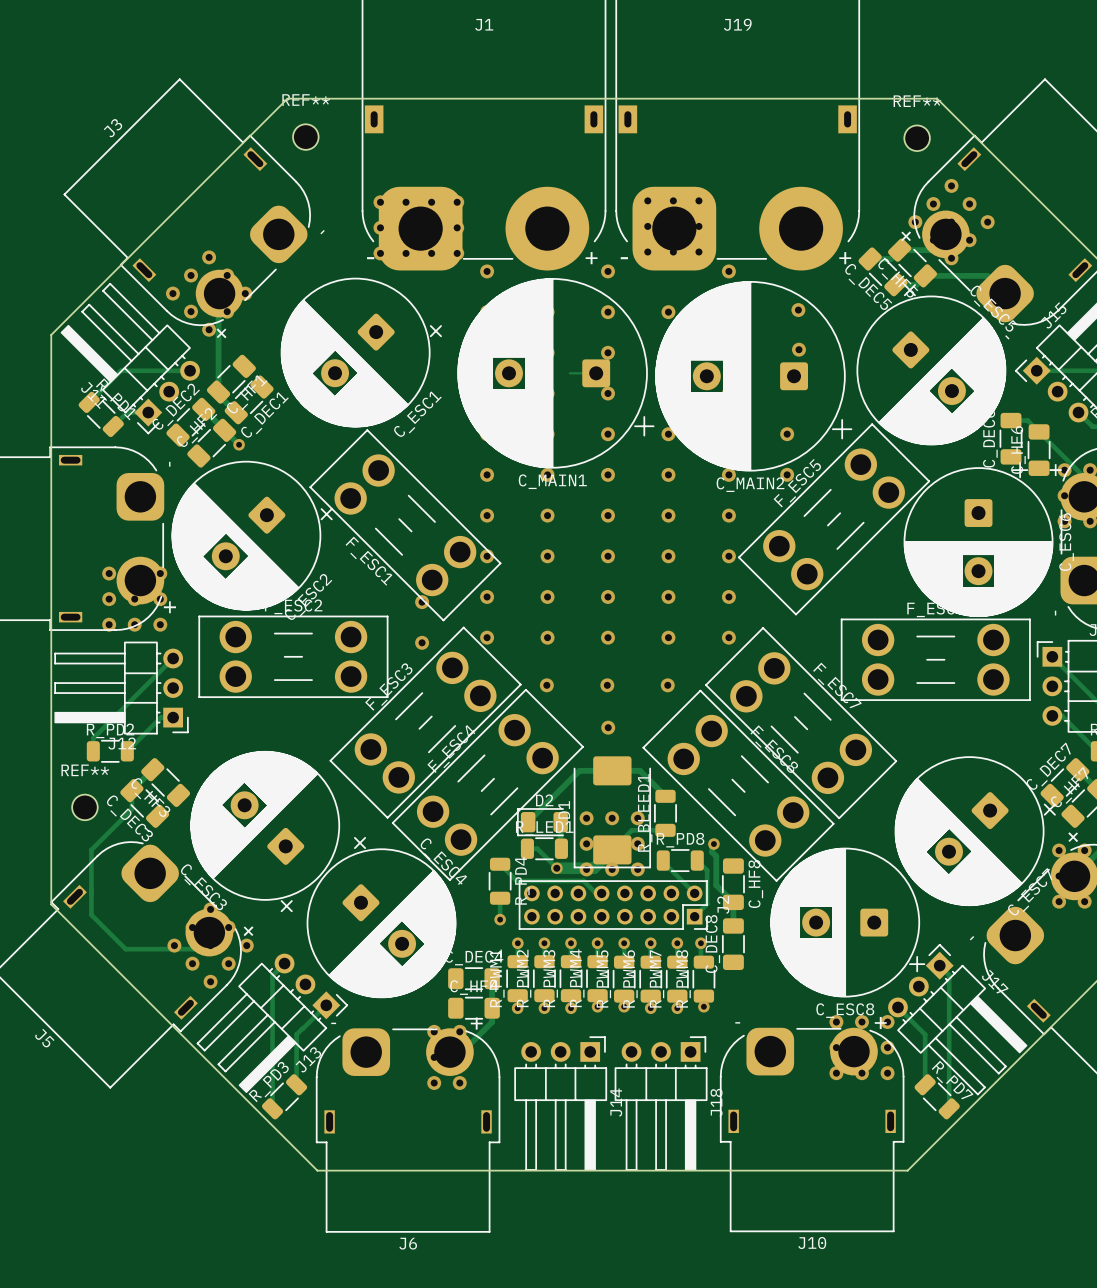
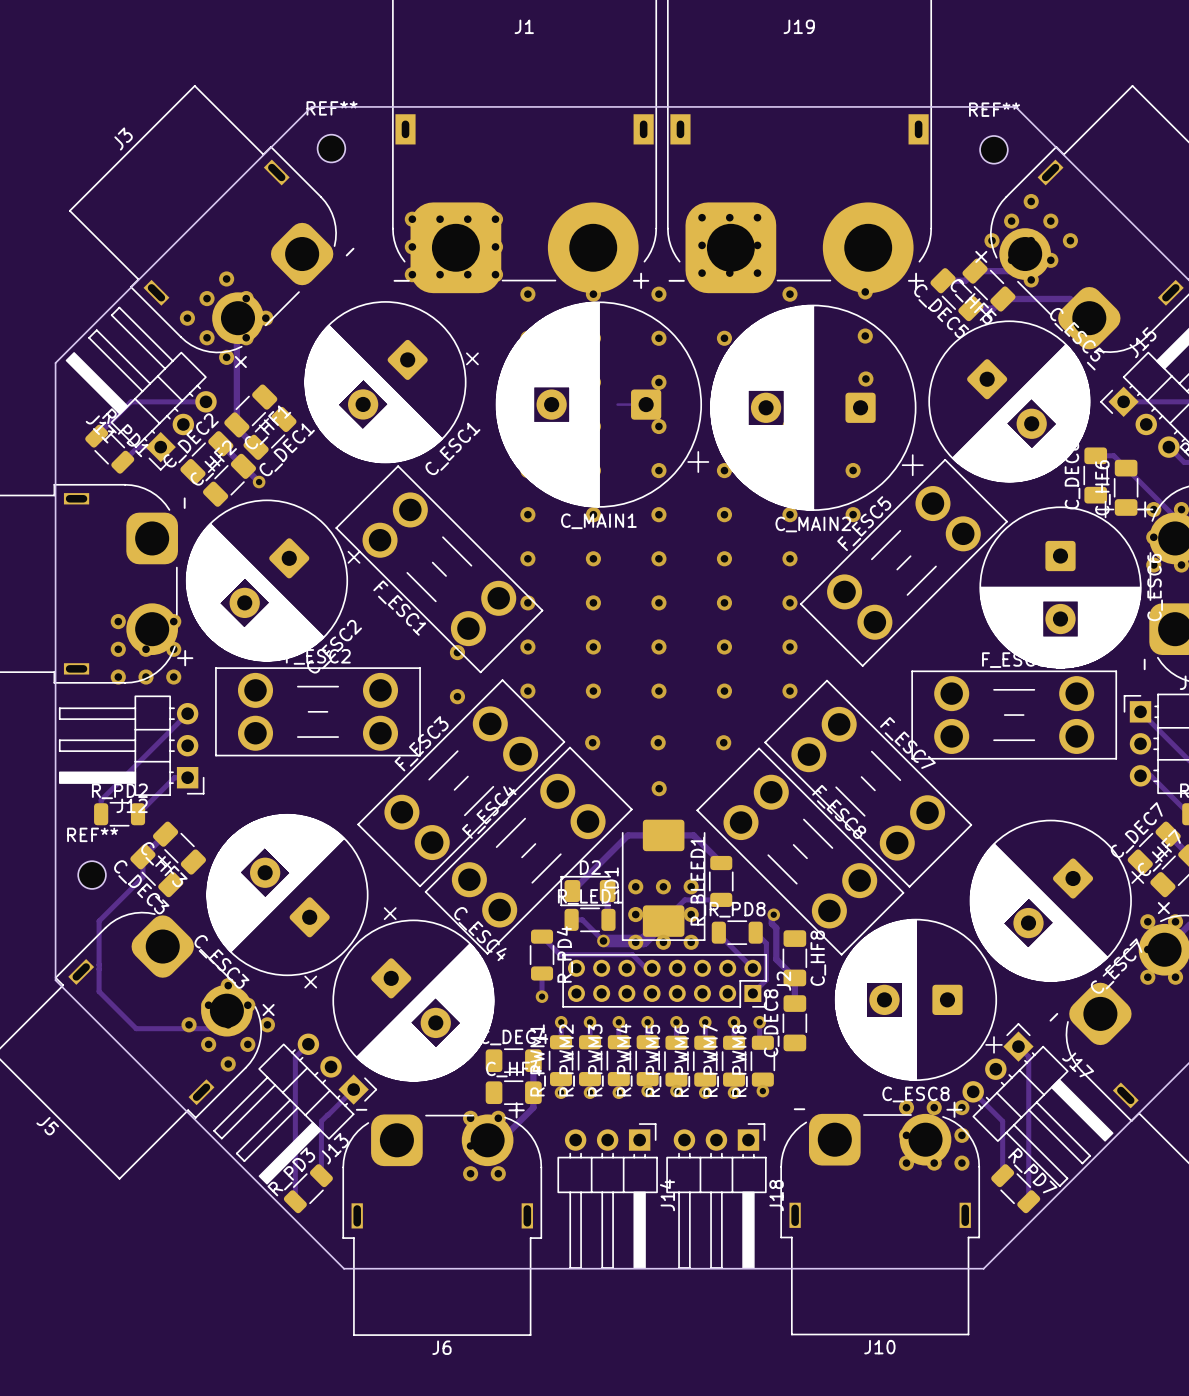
via: none -> (865, 291)
via: none -> (593, 294)

